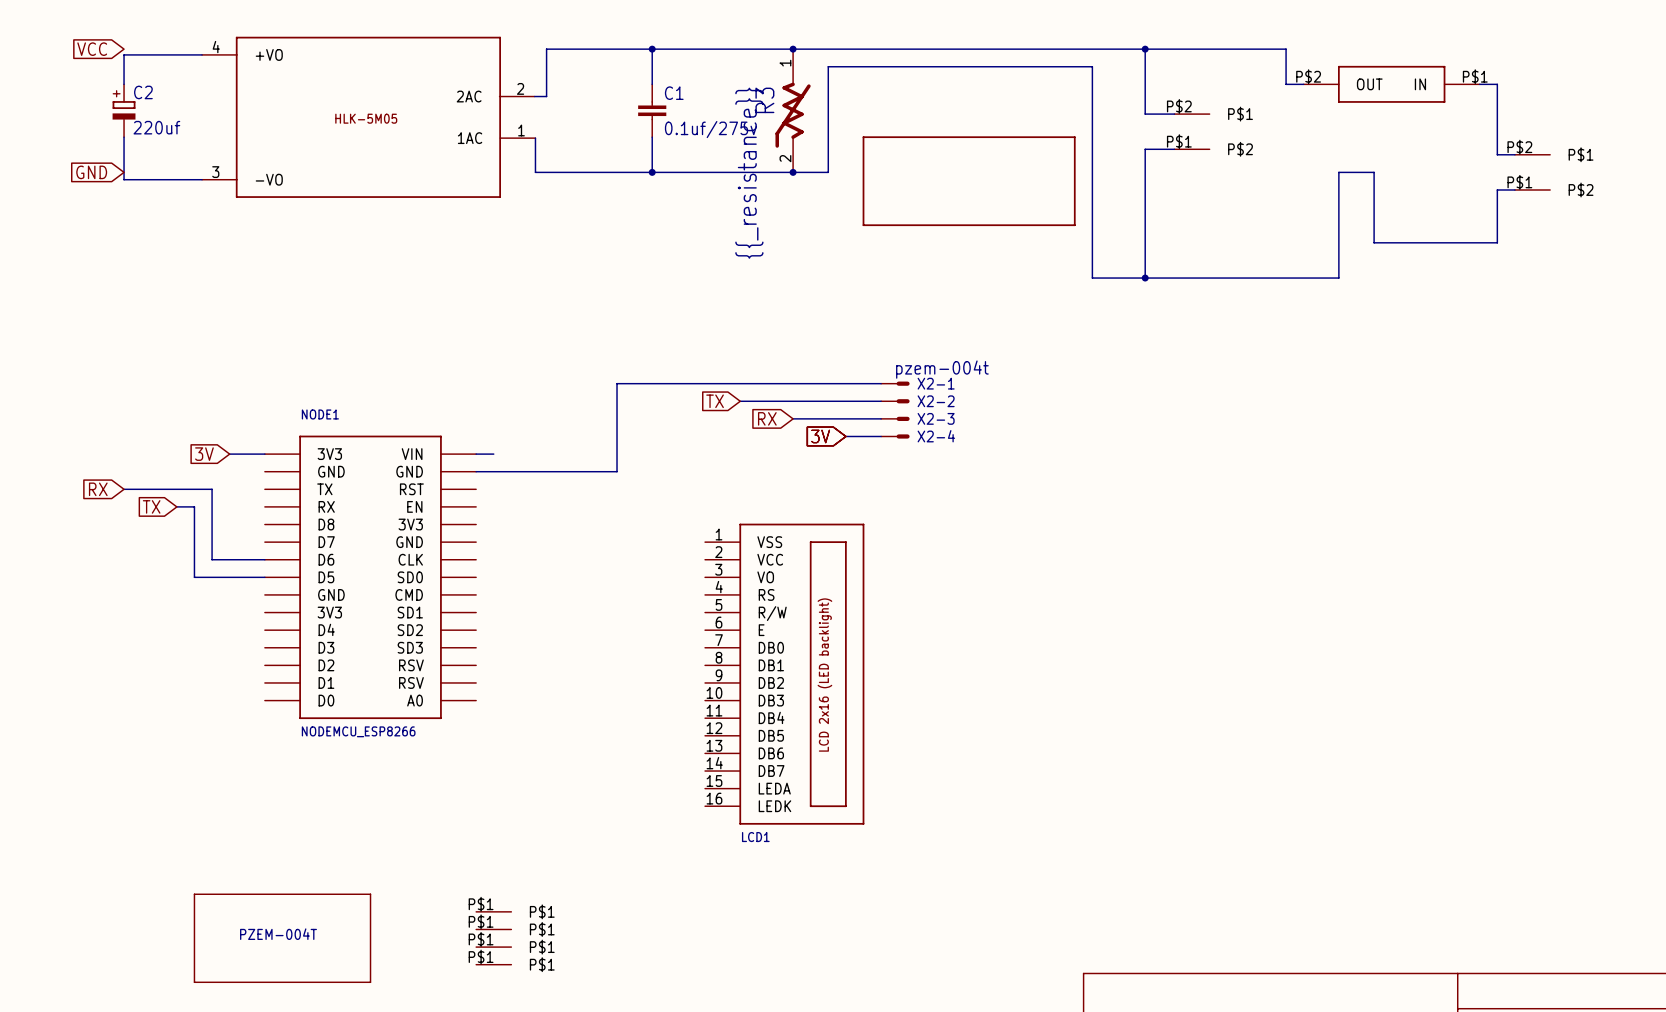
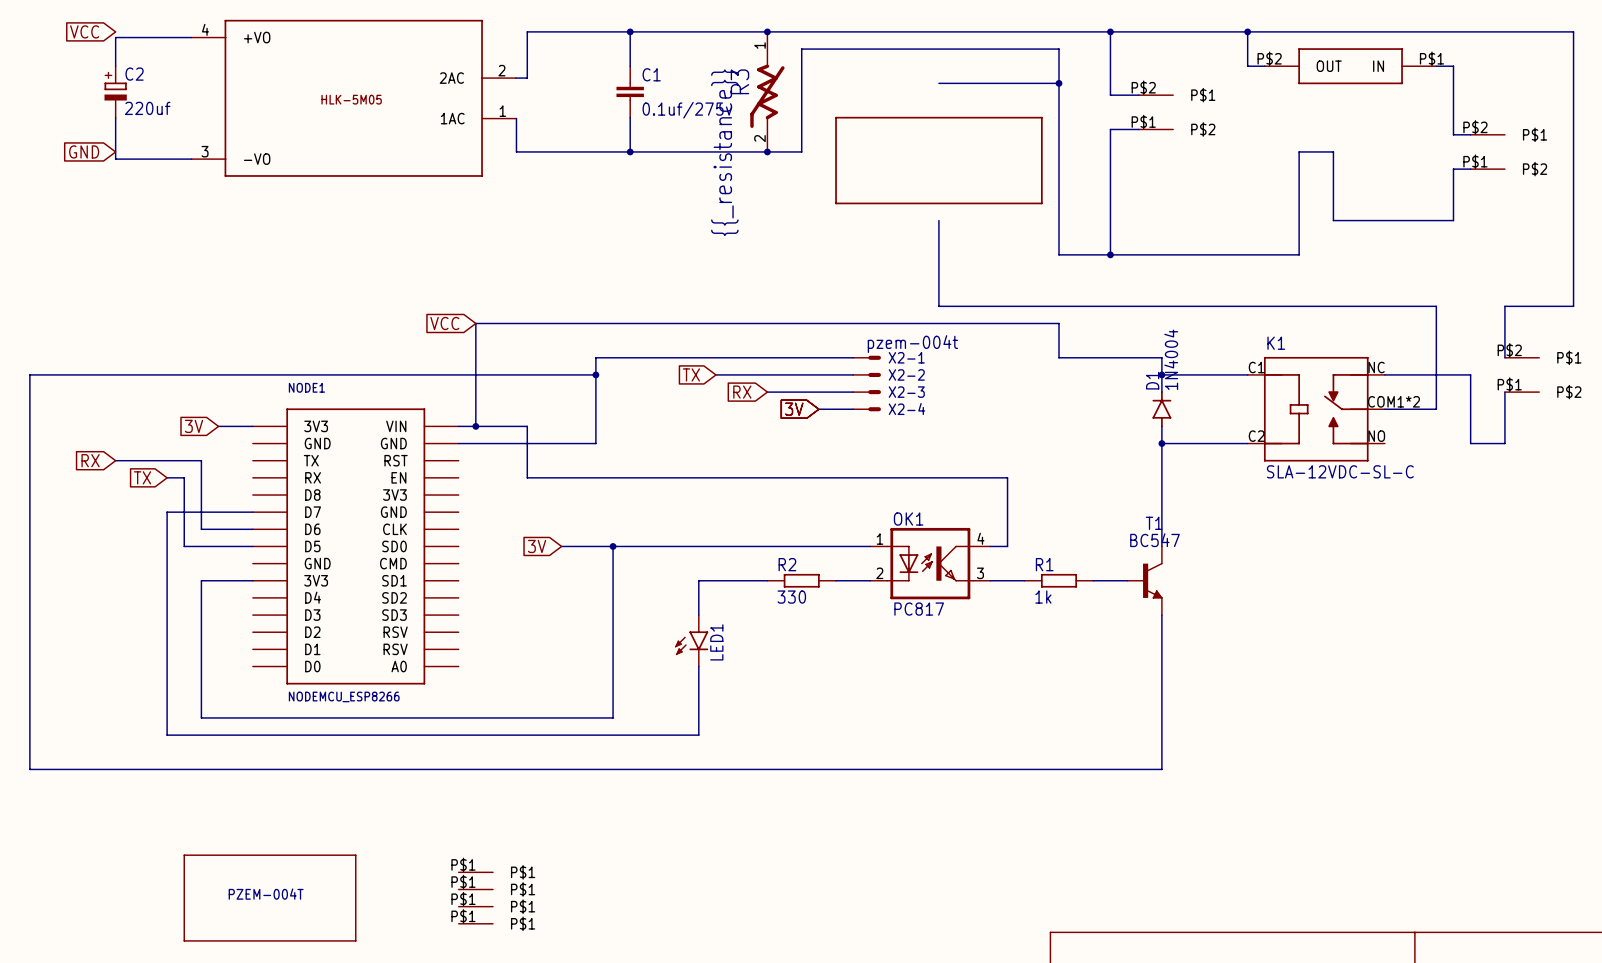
wire: none -> (1247, 31) (1573, 31) (1573, 306) (1504, 306) (1504, 357)
junction: none -> (1247, 31)
wire: none -> (938, 83) (1058, 83)
junction: none -> (1058, 83)
wire: none -> (938, 220) (938, 306) (1436, 306) (1436, 409) (1384, 409)
global label: none -> VCC (444, 323)
wire: none -> (595, 374) (29, 374) (29, 769) (1161, 769) (1161, 615)
junction: none -> (595, 374)
wire: none -> (1161, 374) (1247, 374)
junction: none -> (1161, 374)
wire: none -> (1384, 374) (1470, 374) (1470, 443) (1504, 443) (1504, 392)
part: none -> (1522, 374)
wire: none -> (1161, 392) (1161, 357) (1058, 357) (1058, 323) (475, 323) (475, 426) (527, 426) (527, 477) (1007, 477) (1007, 546) (990, 546)
D1: none -> 1N4004 (1161, 409)
K1: none -> SLA-12VDC-SL-C (1316, 409)
junction: none -> (475, 426)
wire: none -> (1161, 426) (1161, 546)
wire: none -> (1161, 443) (1247, 443)
junction: none -> (1161, 443)
wire: none -> (252, 512) (167, 512) (167, 735) (698, 735) (698, 666)
global label: none -> 3V (537, 546)
wire: none -> (561, 546) (870, 546)
wire: none -> (613, 546) (613, 717) (201, 717) (201, 580) (252, 580)
junction: none -> (613, 546)
OK1: none -> PC817 (930, 563)
wire: none -> (767, 580) (698, 580) (698, 615)
R2: none -> 330 (801, 580)
wire: none -> (836, 580) (870, 580)
wire: none -> (990, 580) (1024, 580)
R1: none -> 1k (1058, 580)
wire: none -> (1093, 580) (1127, 580)
T1: none -> BC547 (1145, 580)
LED1: none -> (691, 640)
LCD1: (784, 674) -> none

